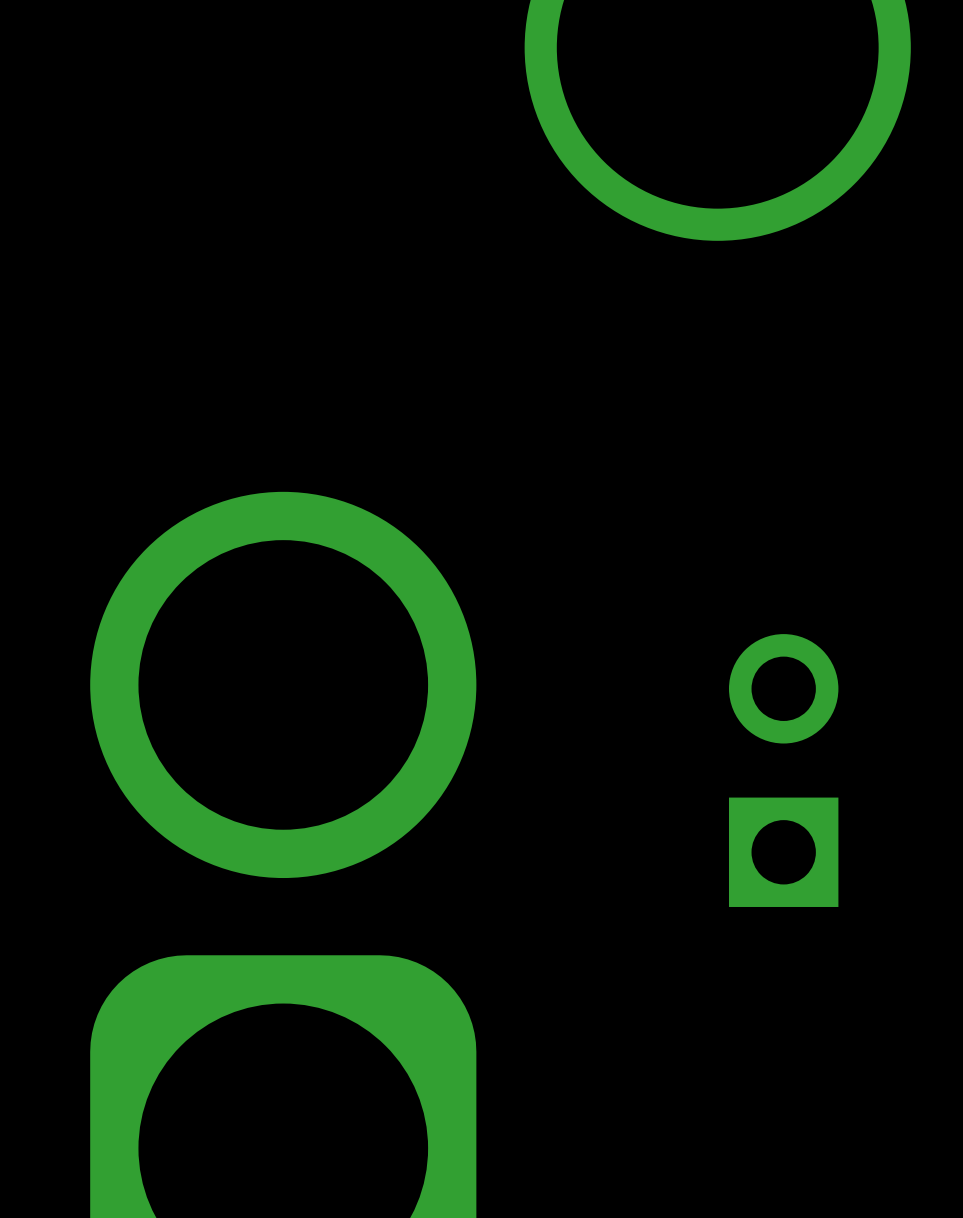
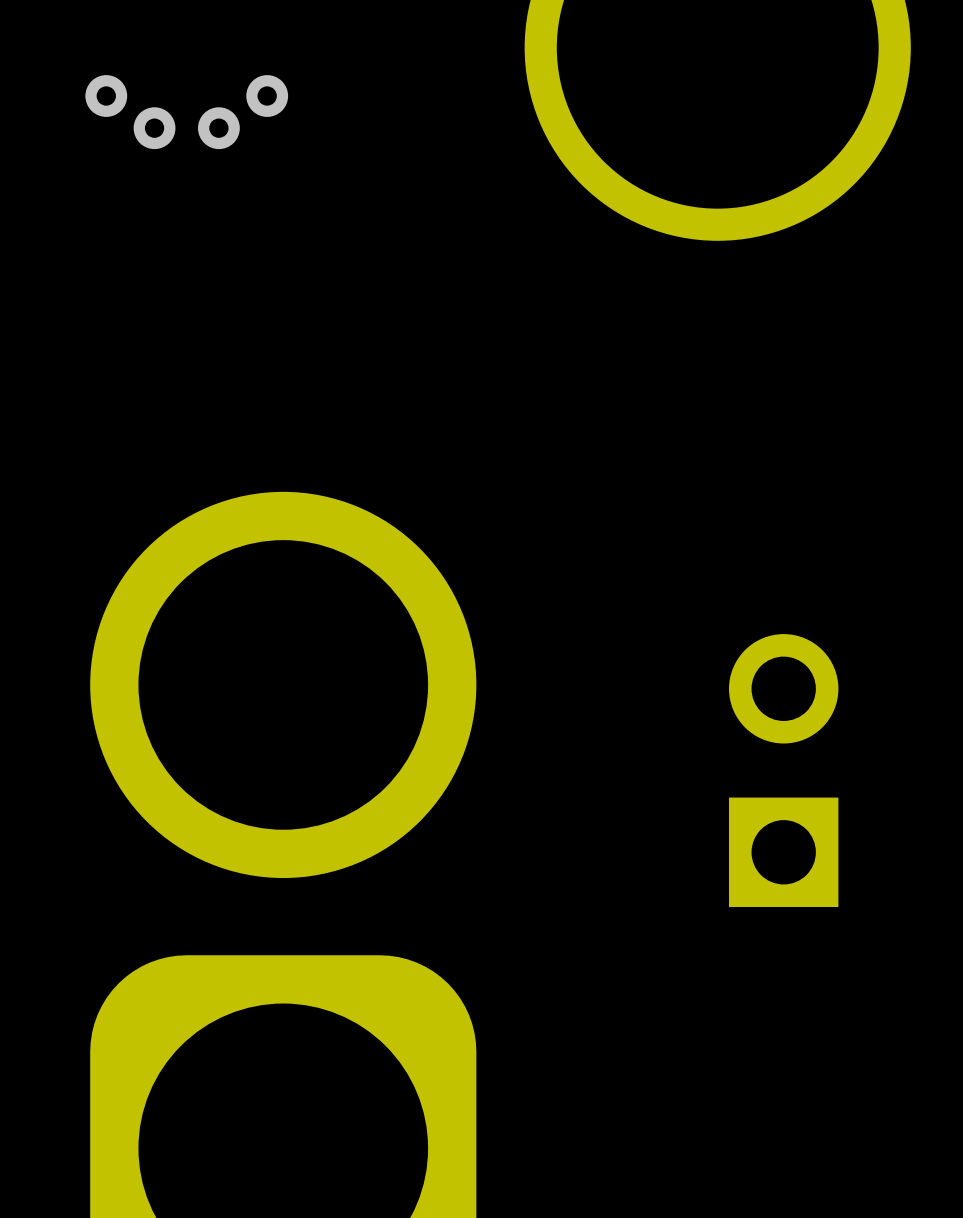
via: none -> (106, 96)
via: none -> (267, 96)
via: none -> (154, 128)
via: none -> (218, 128)

